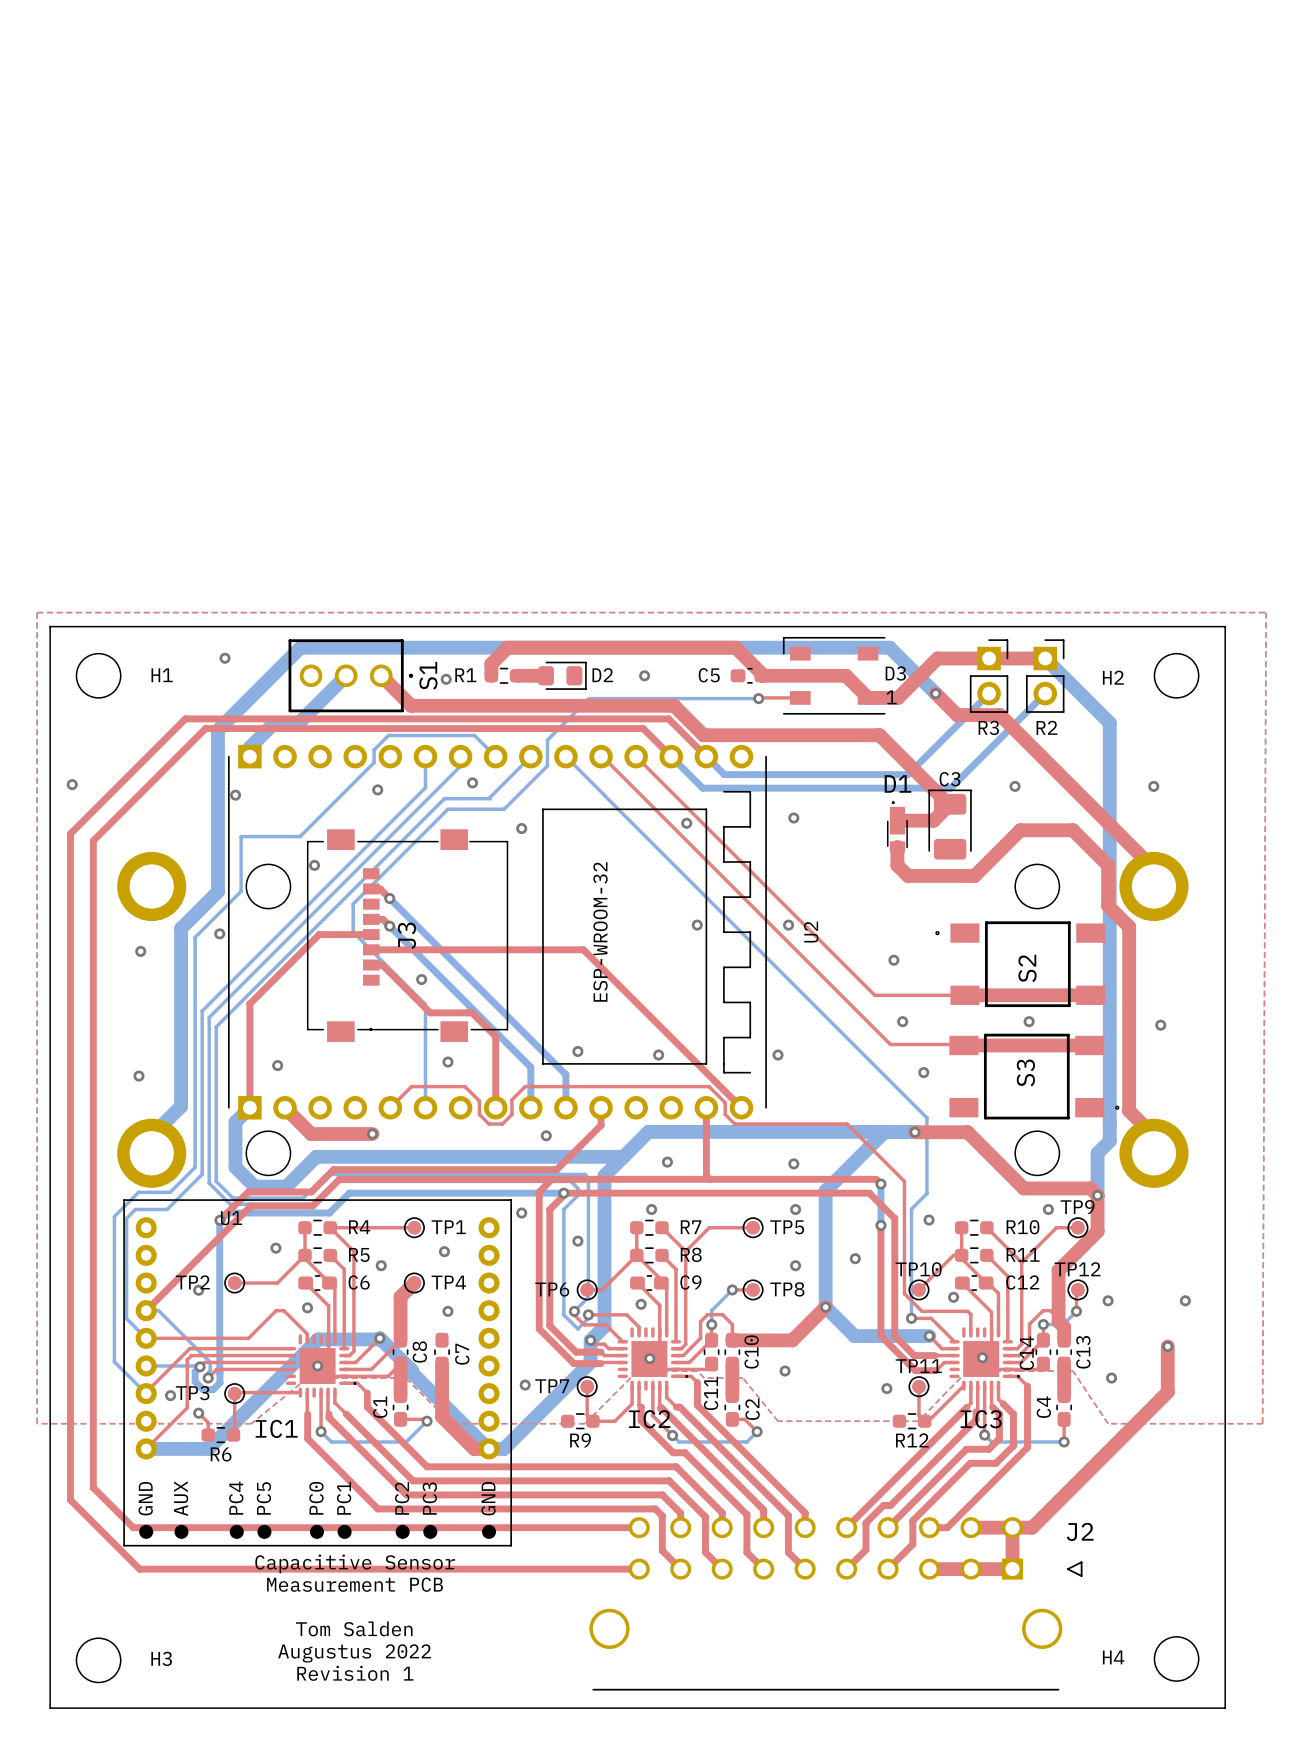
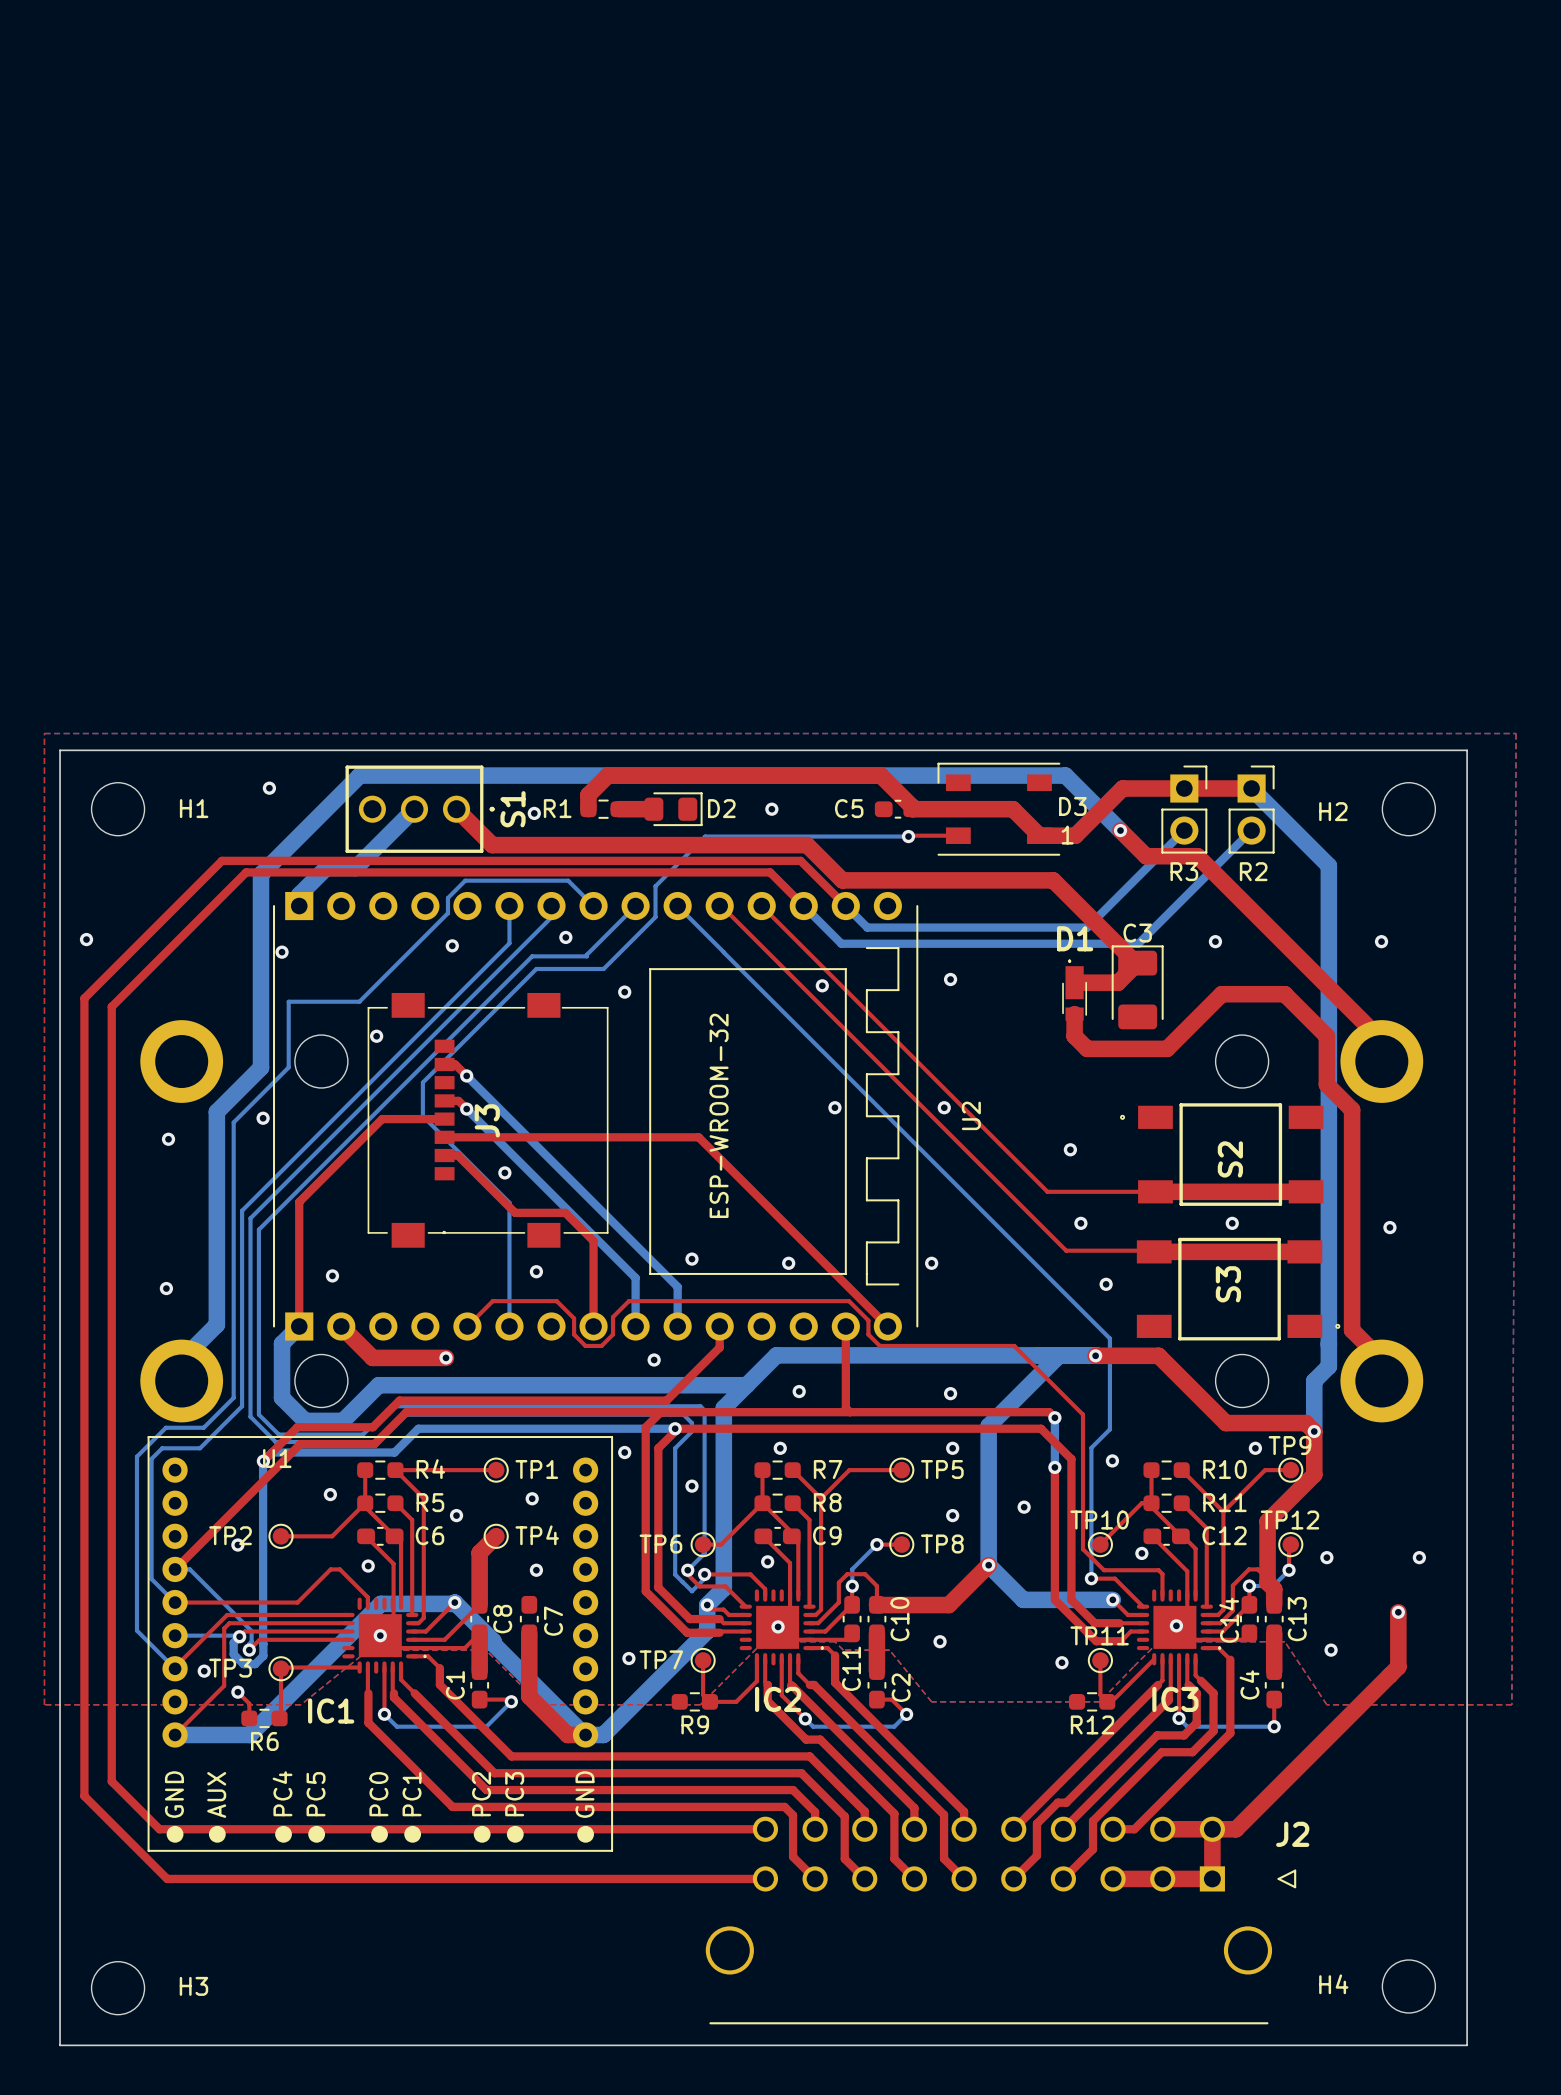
text: Capacitive Sensor (355, 1563) -> none
text: Measurement PCB (355, 1584) -> none
text: Tom Salden (354, 1628) -> none
text: Augustus 2022 (354, 1653) -> none
text: Revision 1 (355, 1673) -> none

